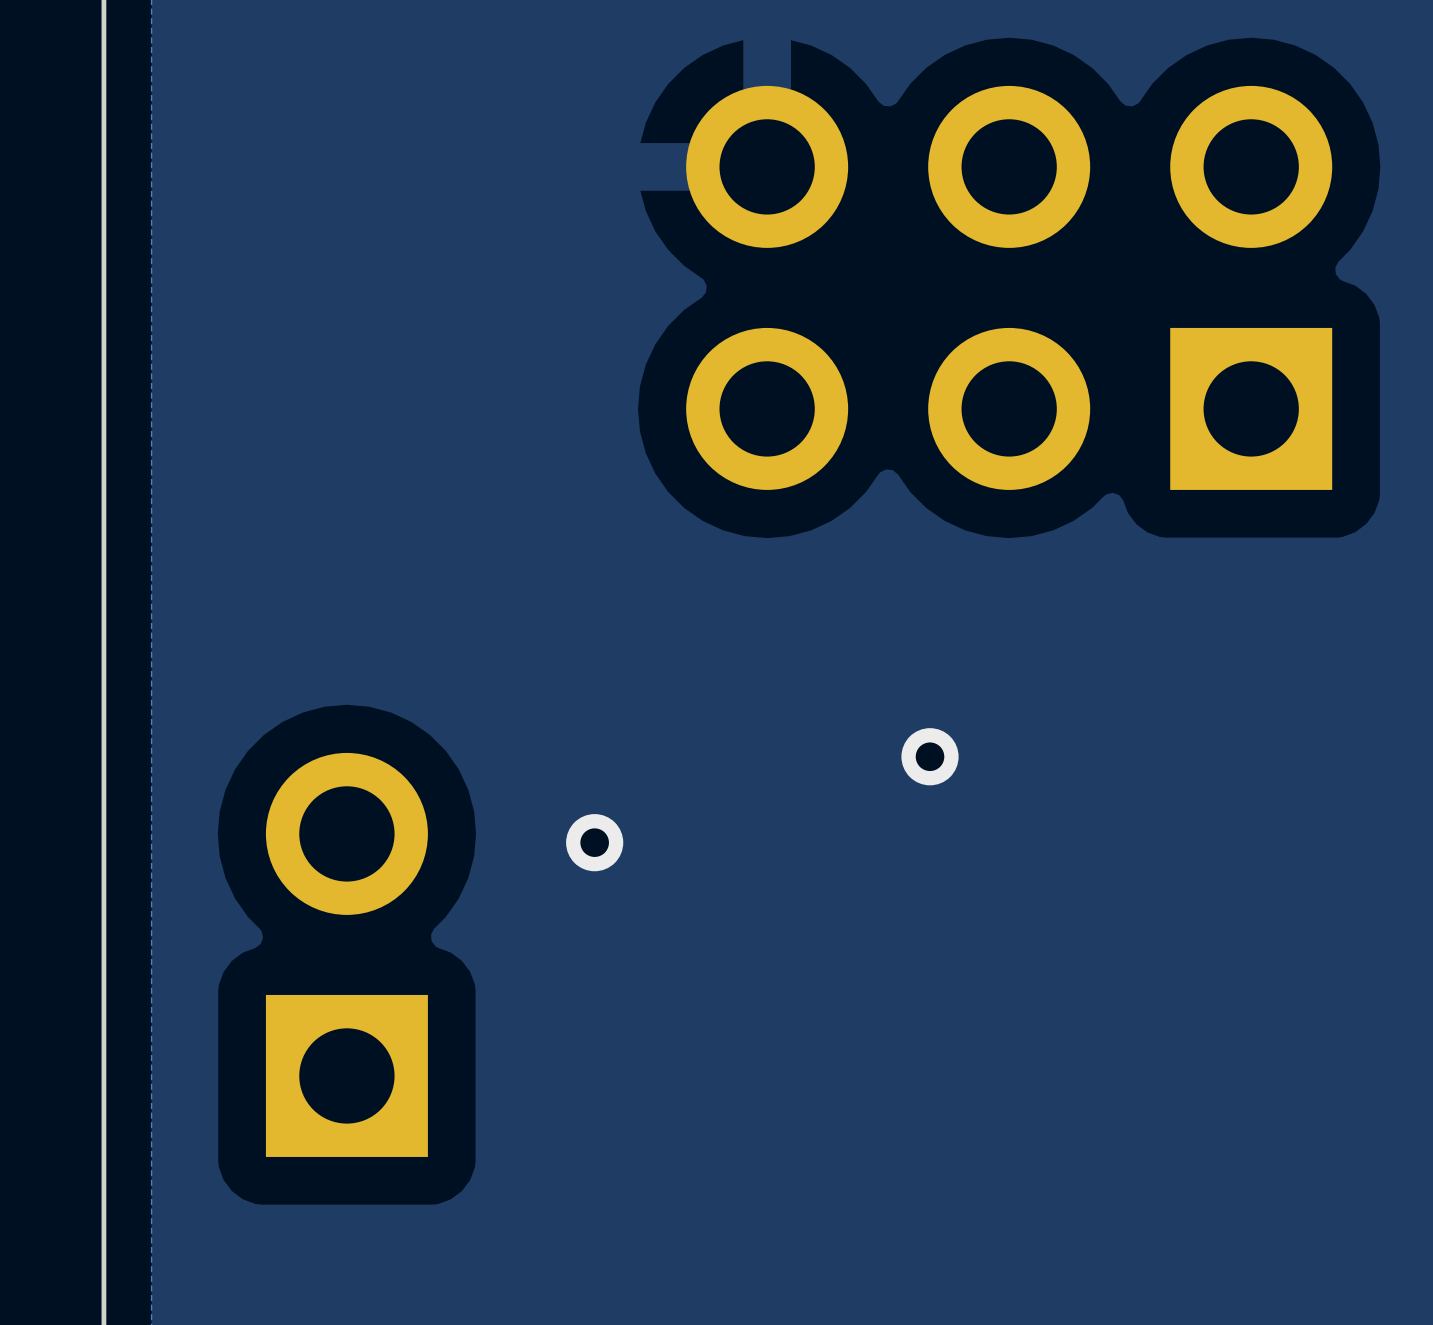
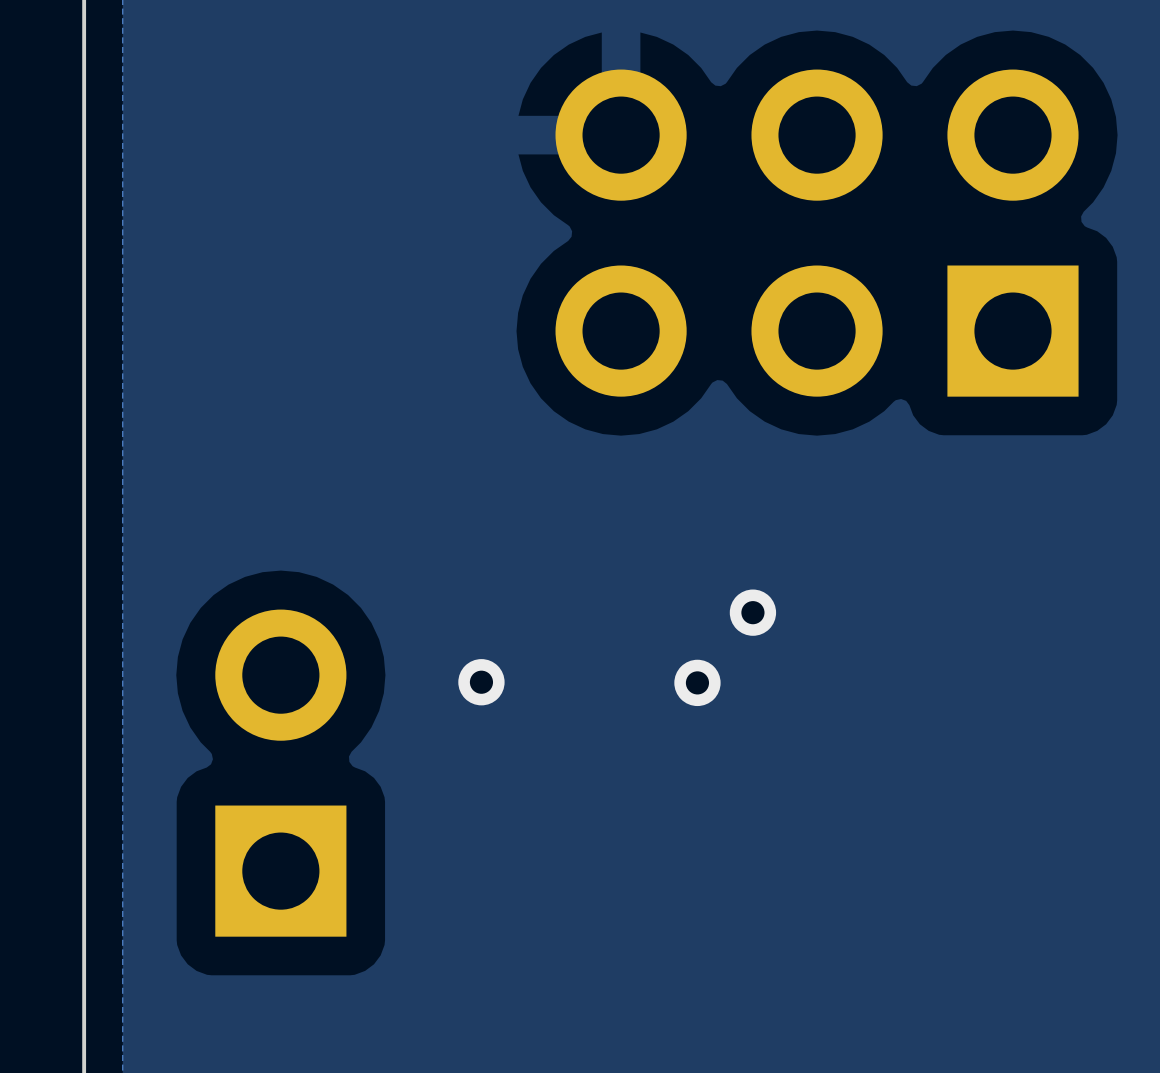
via: none -> (697, 682)

